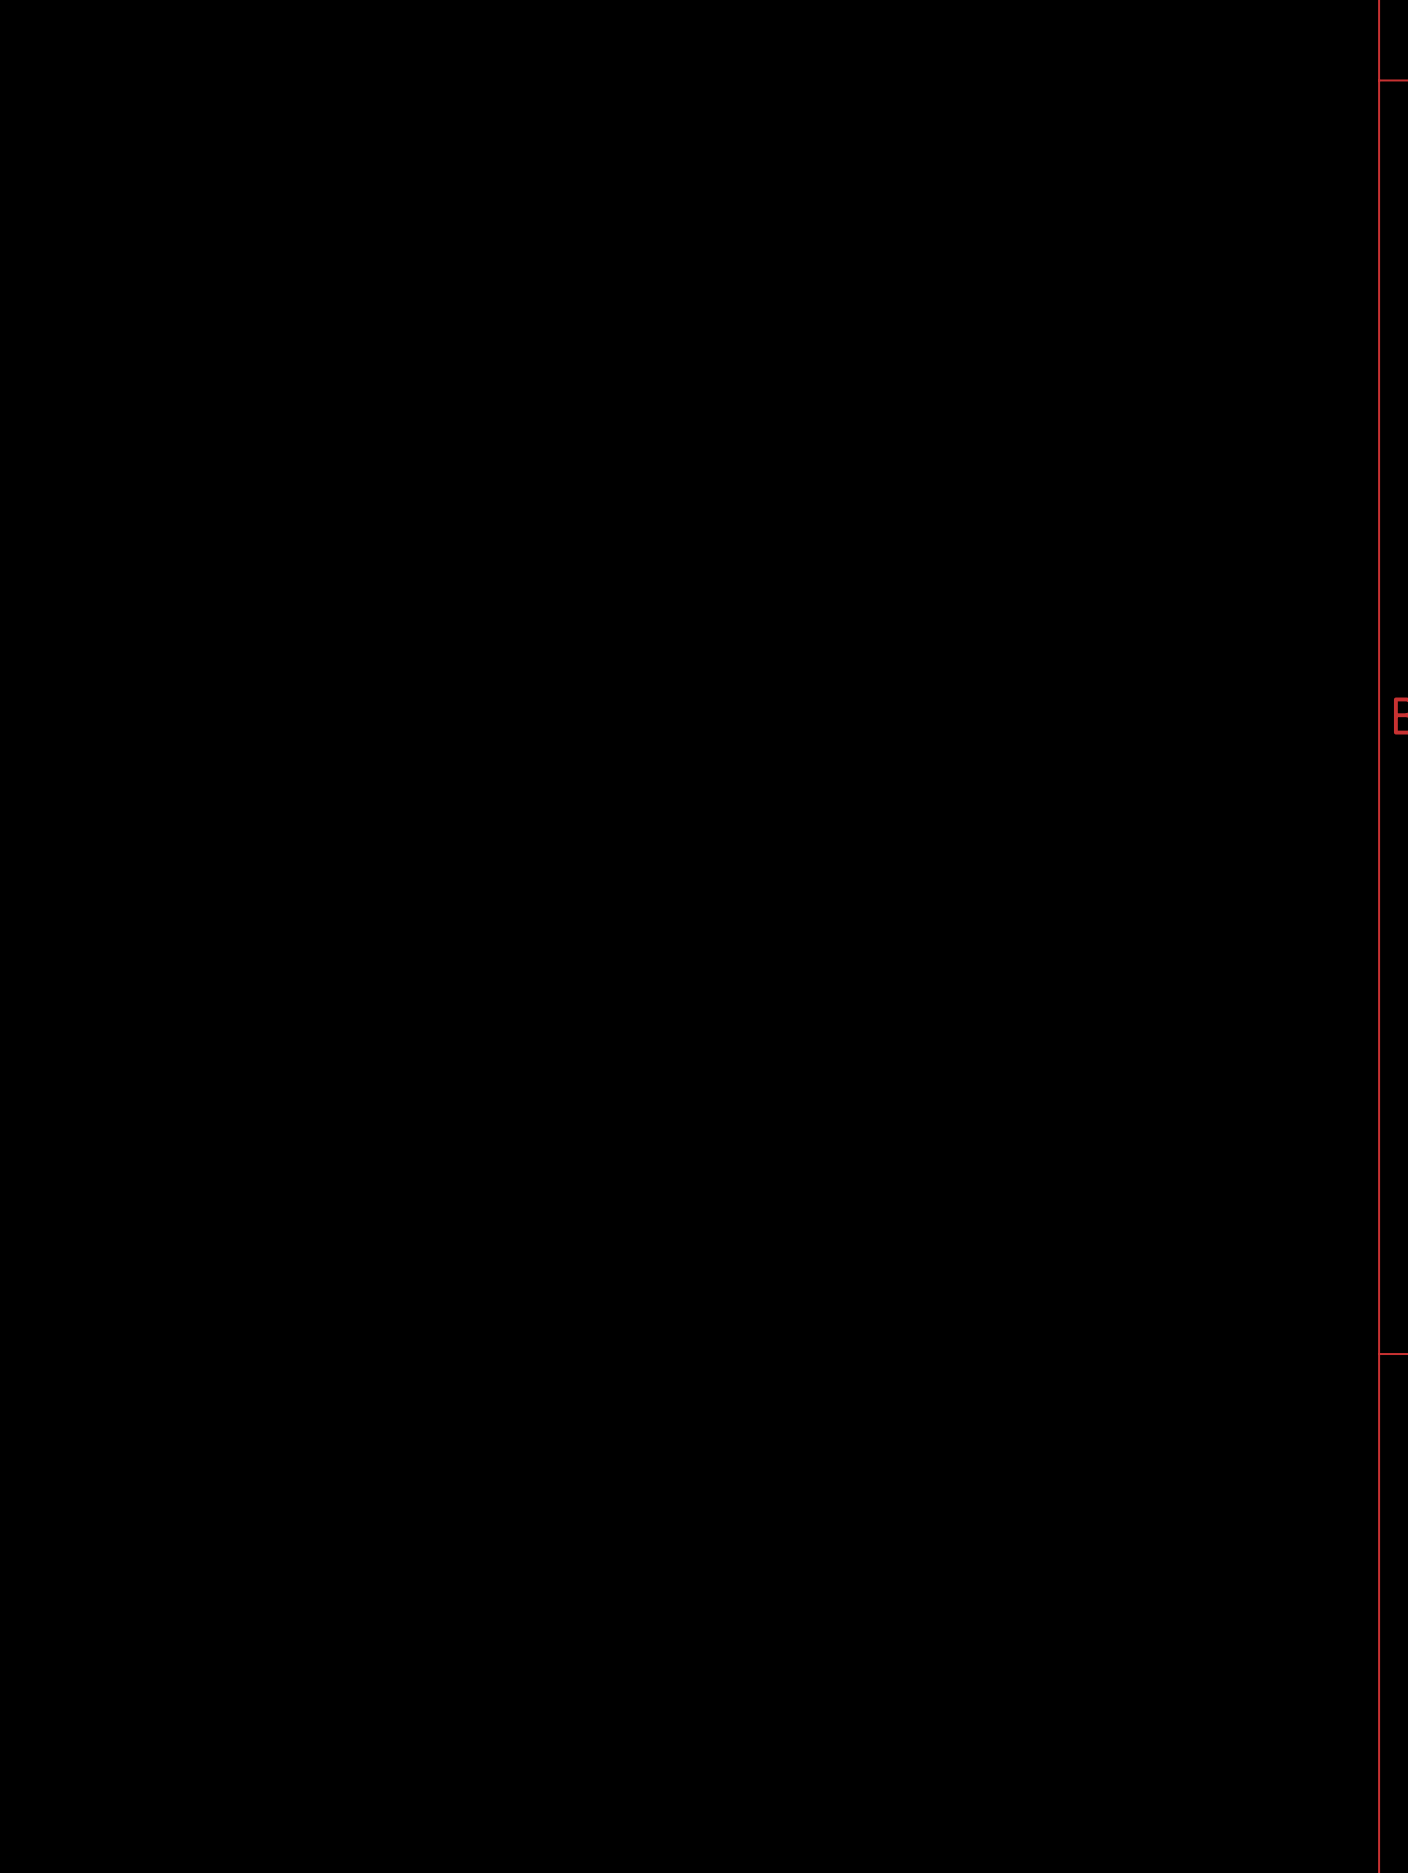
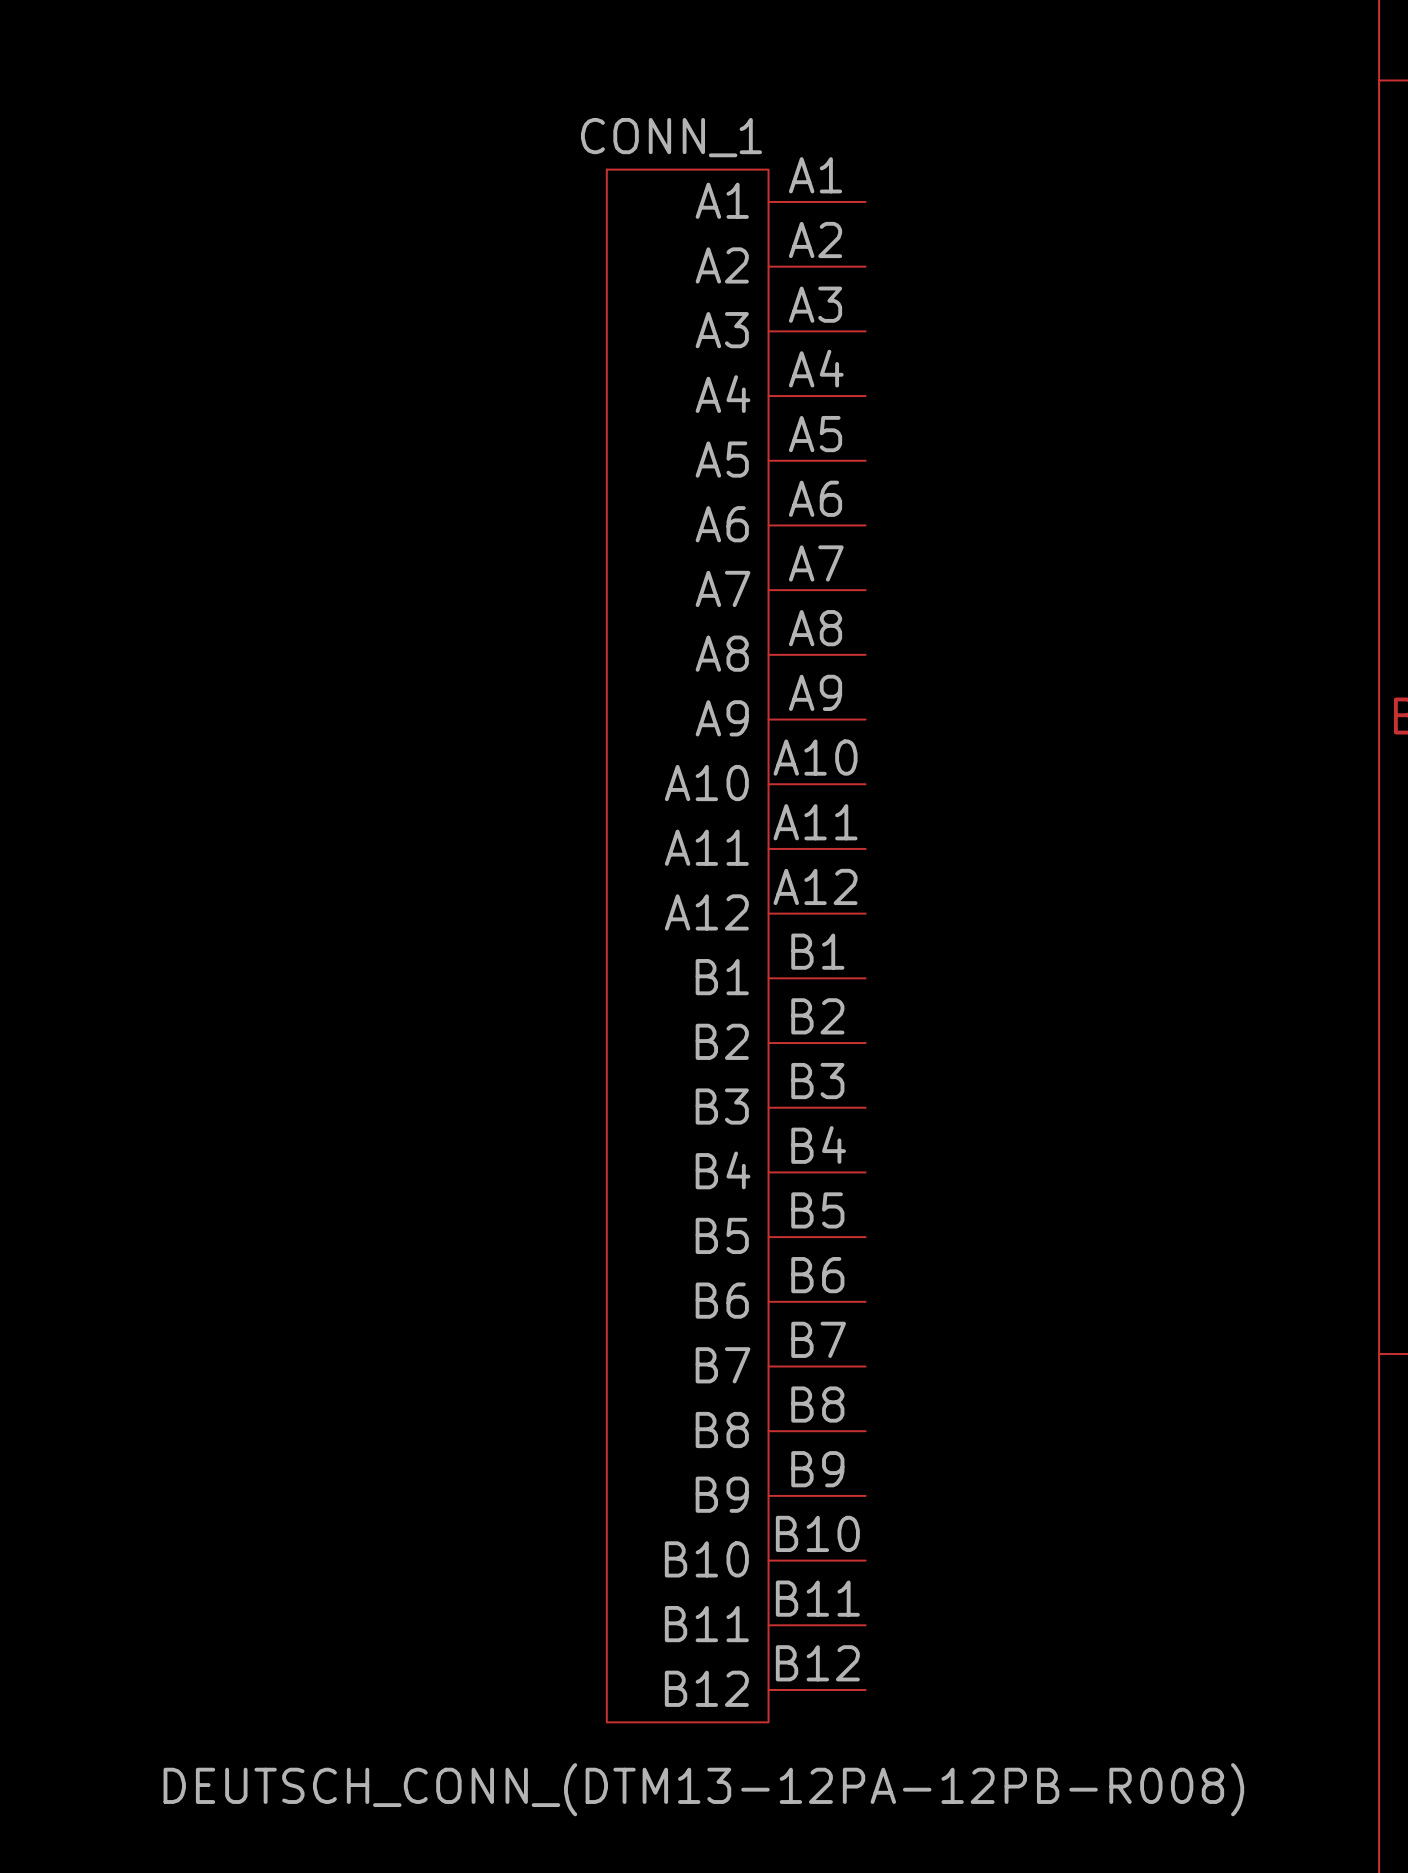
CONN_1: none -> DEUTSCH_CONN_(DTM13-12PA-12PB-R008) (736, 945)

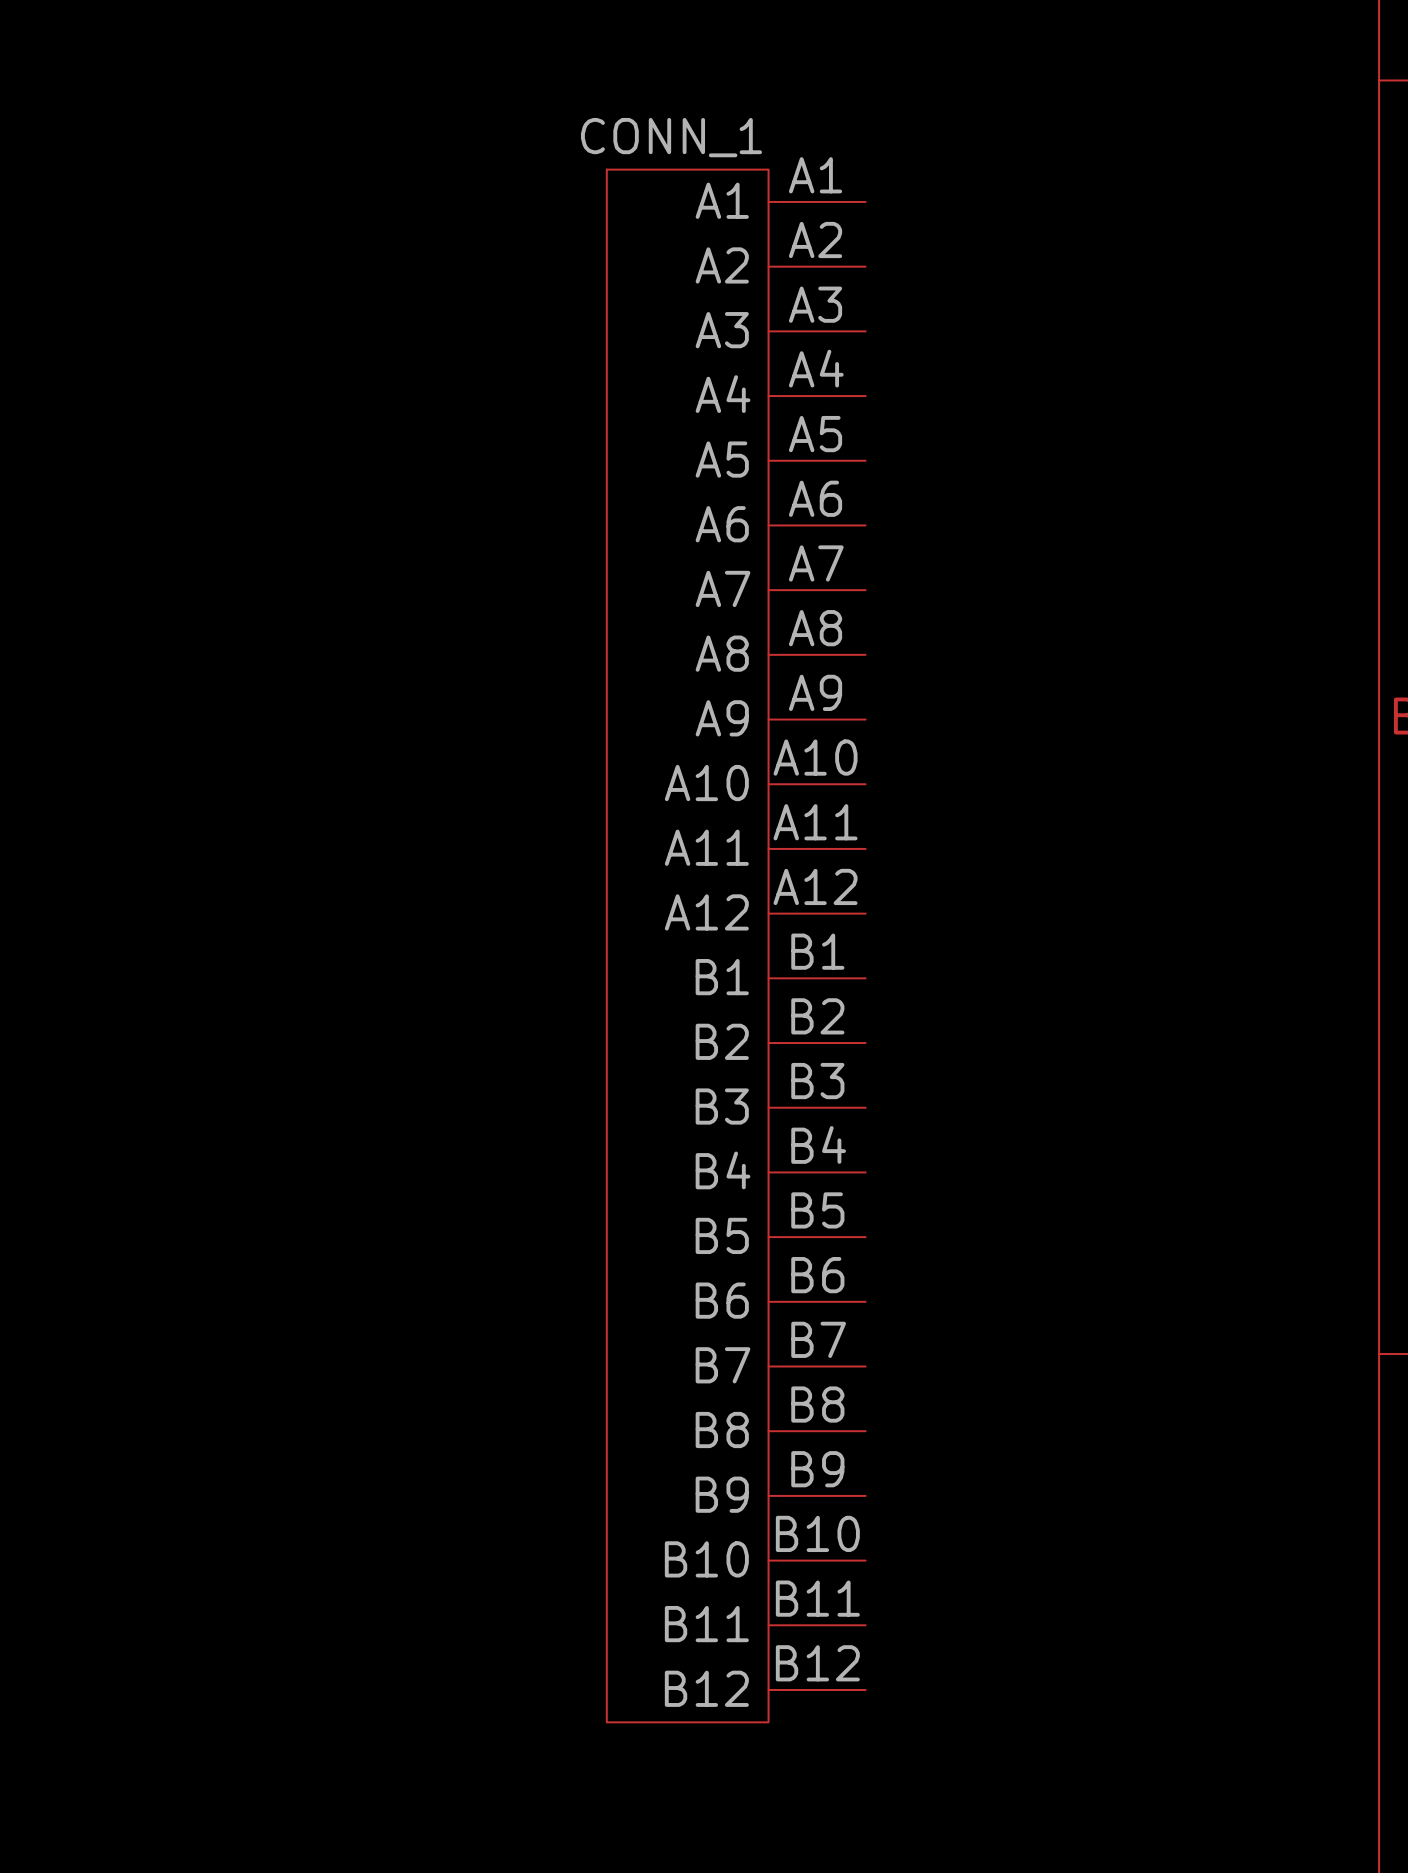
CONN_1 value: DEUTSCH_CONN_(DTM13-12PA-12PB-R008) (703, 1789) -> none

